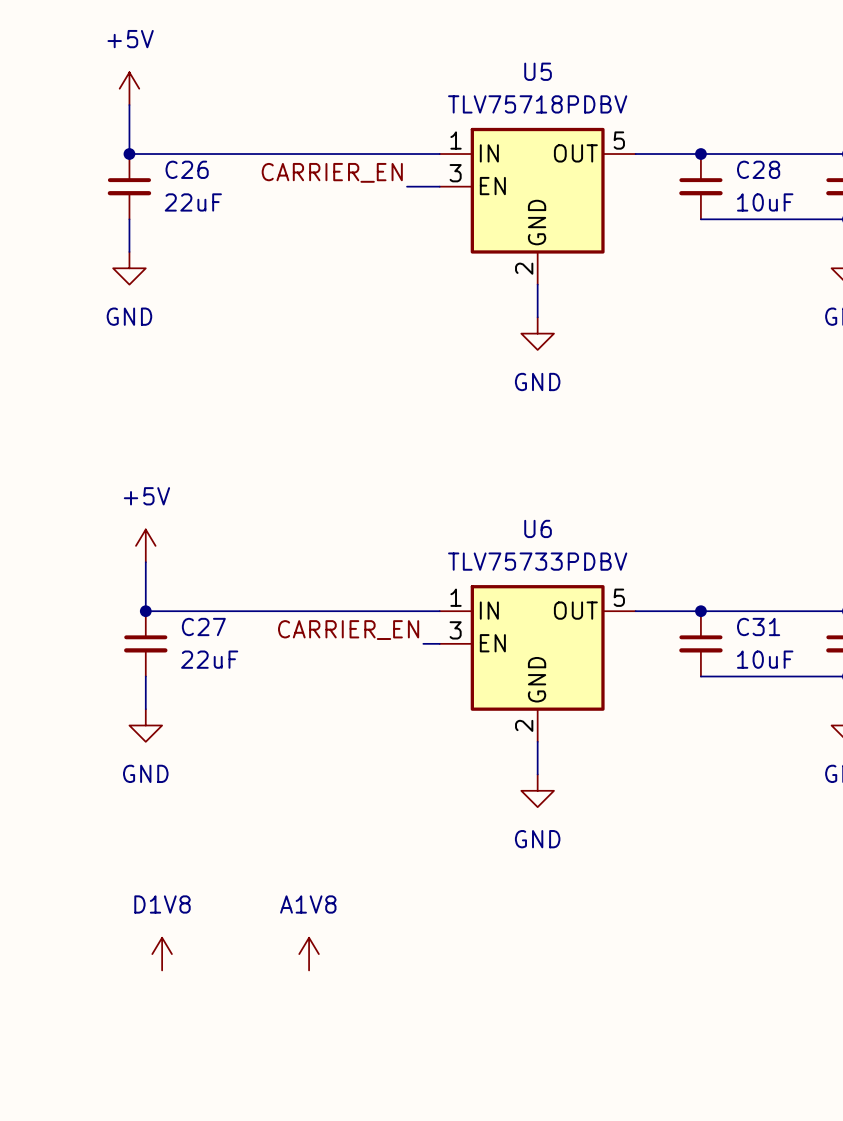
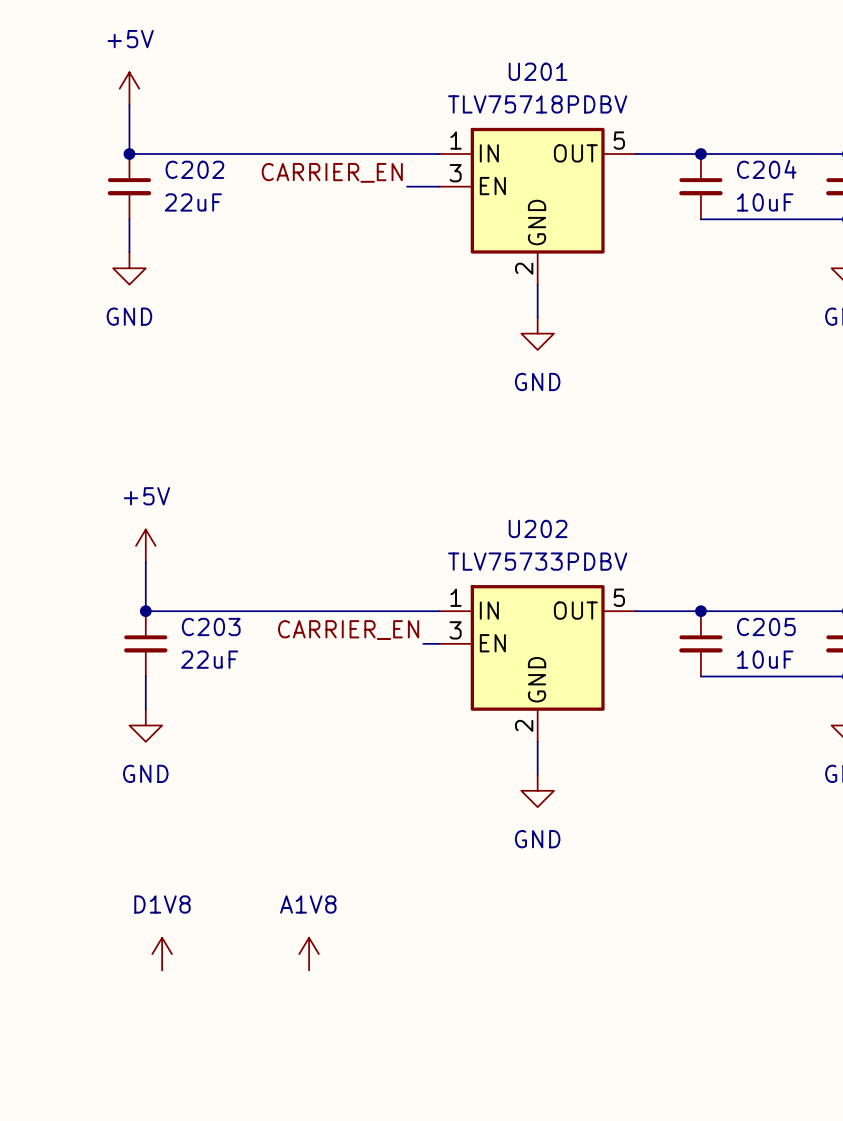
U5 name: U5 (538, 71) -> U201 (538, 71)
C26 name: C26 (187, 169) -> C202 (194, 169)
C28 name: C28 (758, 169) -> C204 (766, 169)
U6 name: U6 (538, 528) -> U202 (538, 528)
C27 name: C27 (203, 626) -> C203 (211, 626)
C31 name: C31 (758, 626) -> C205 (766, 626)

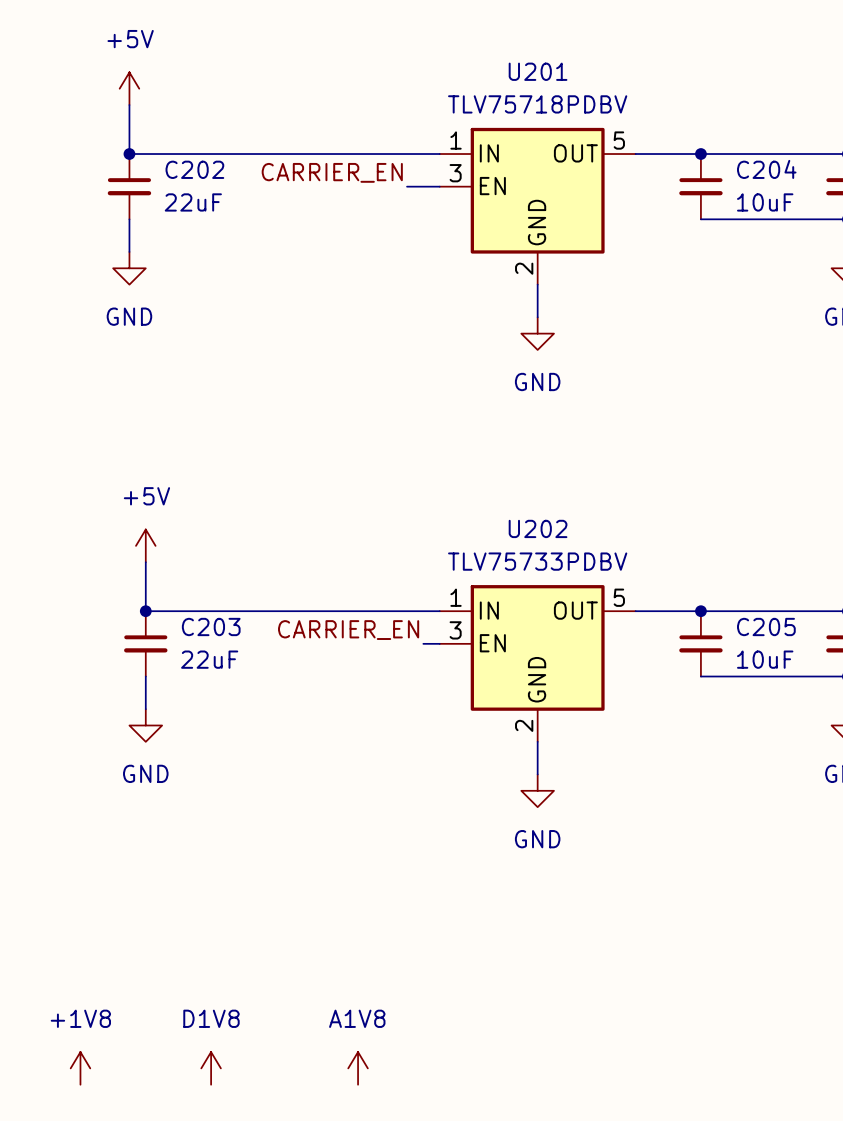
power symbol position: D1V8 (162, 954) -> D1V8 (211, 1068)
power symbol position: A1V8 (309, 954) -> A1V8 (358, 1068)
power symbol: none -> +1V8 (80, 1068)

